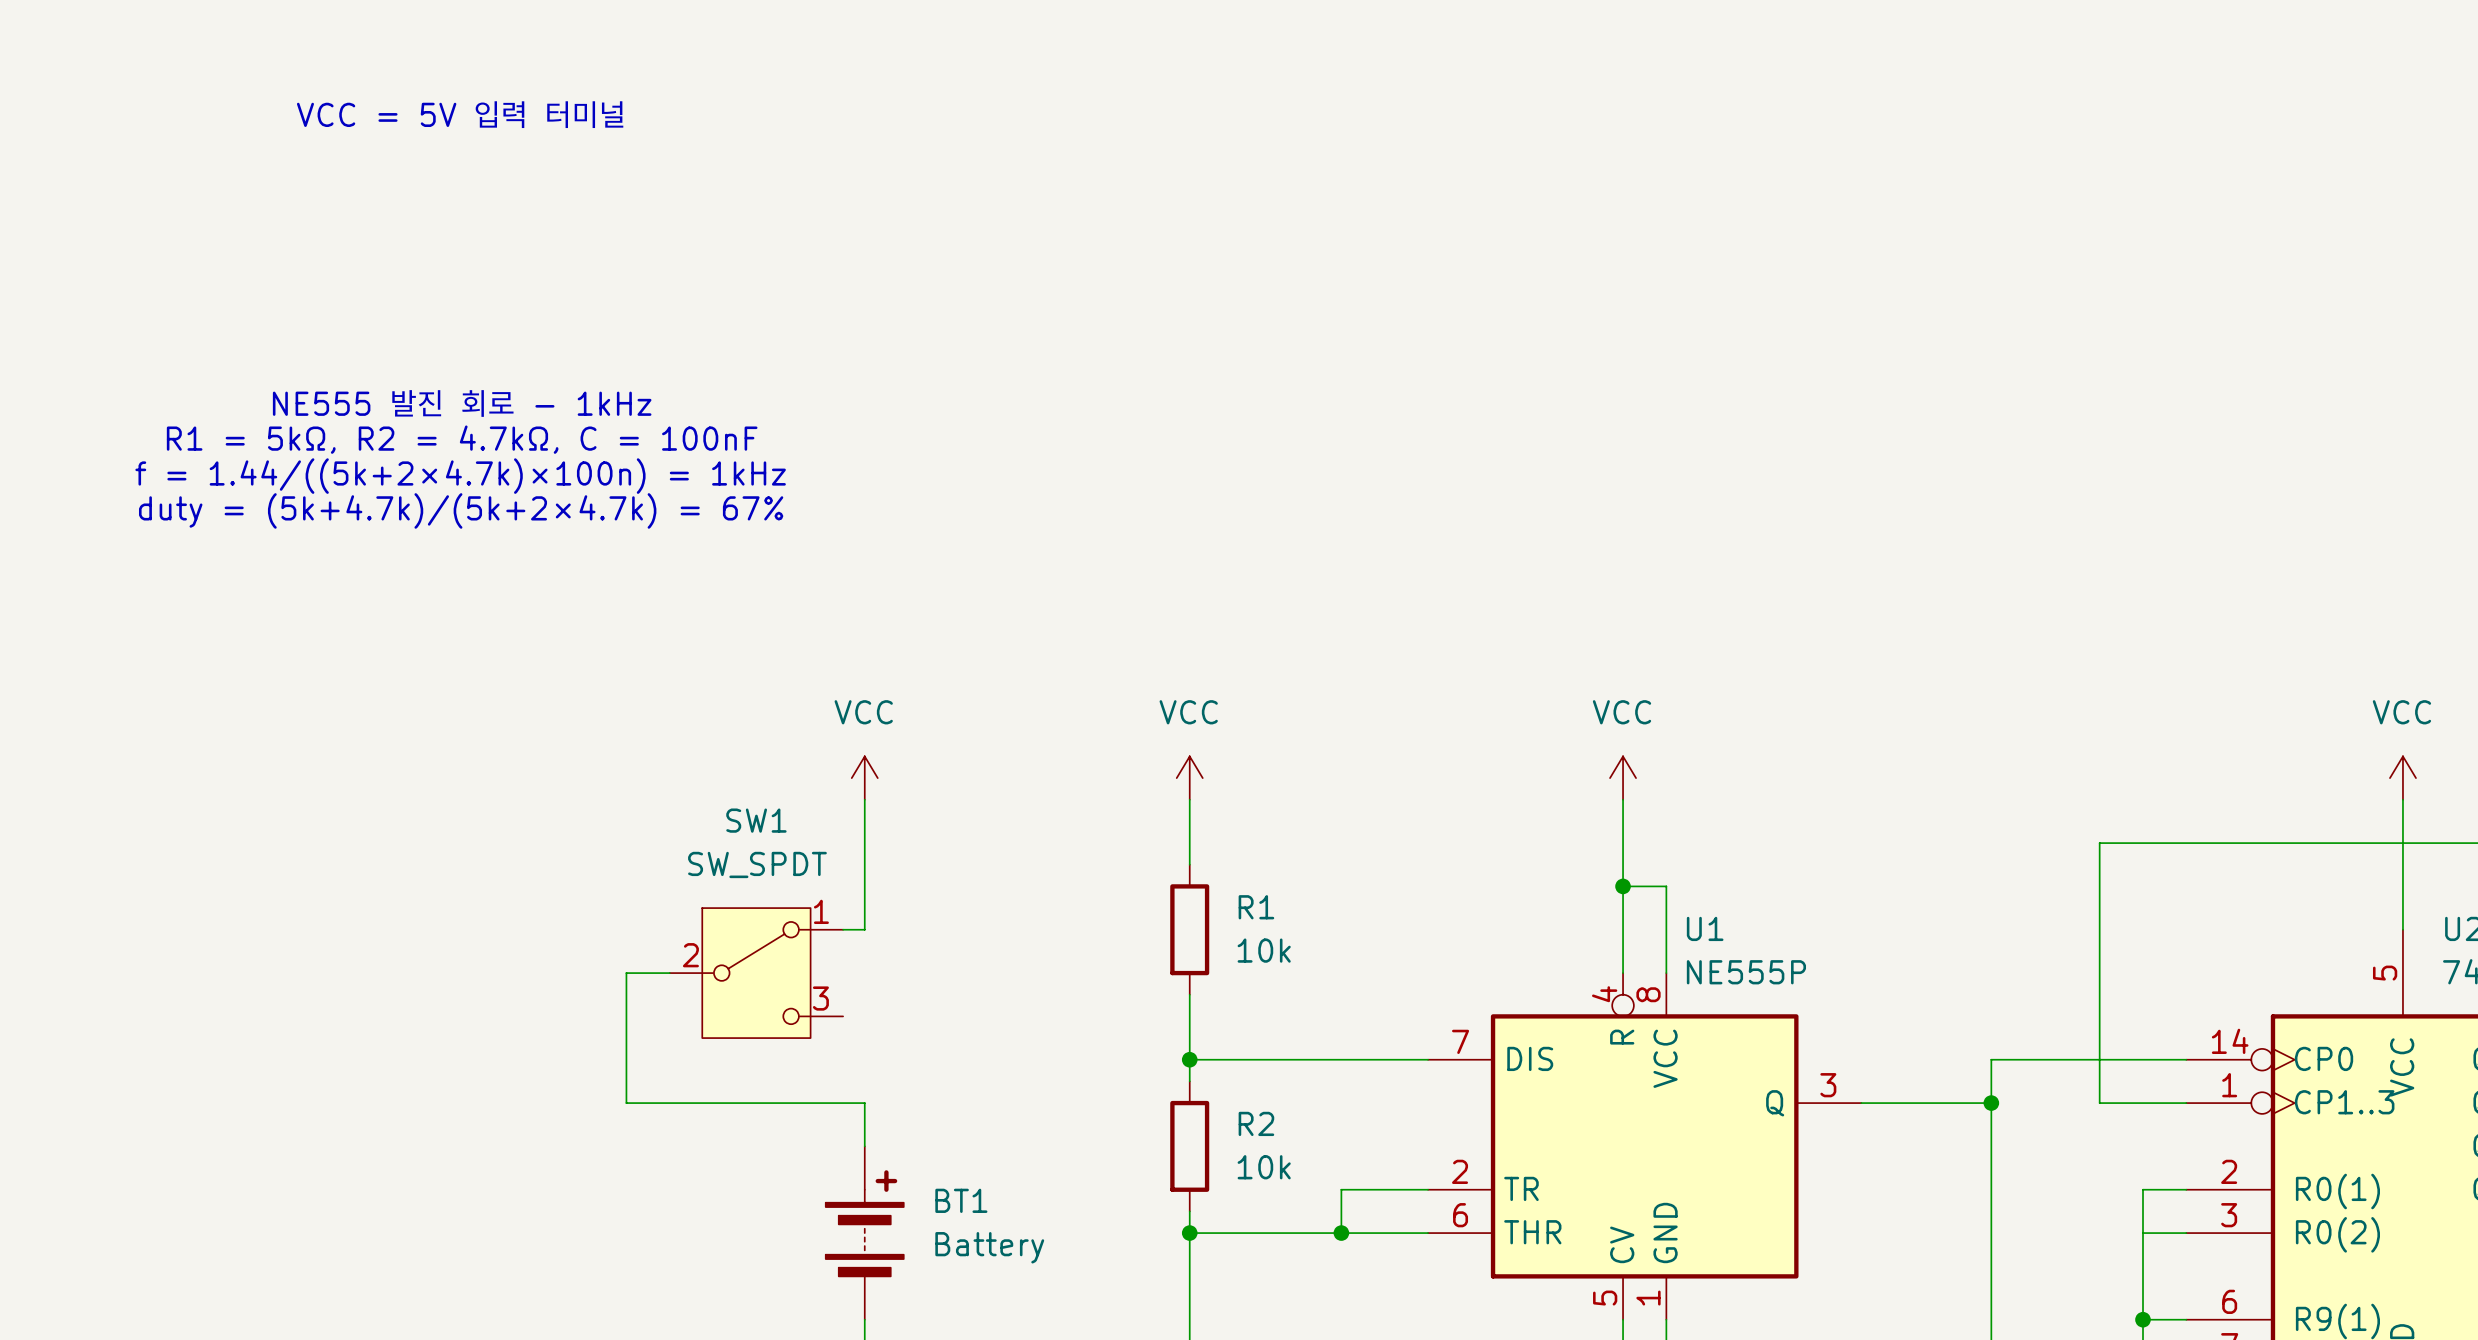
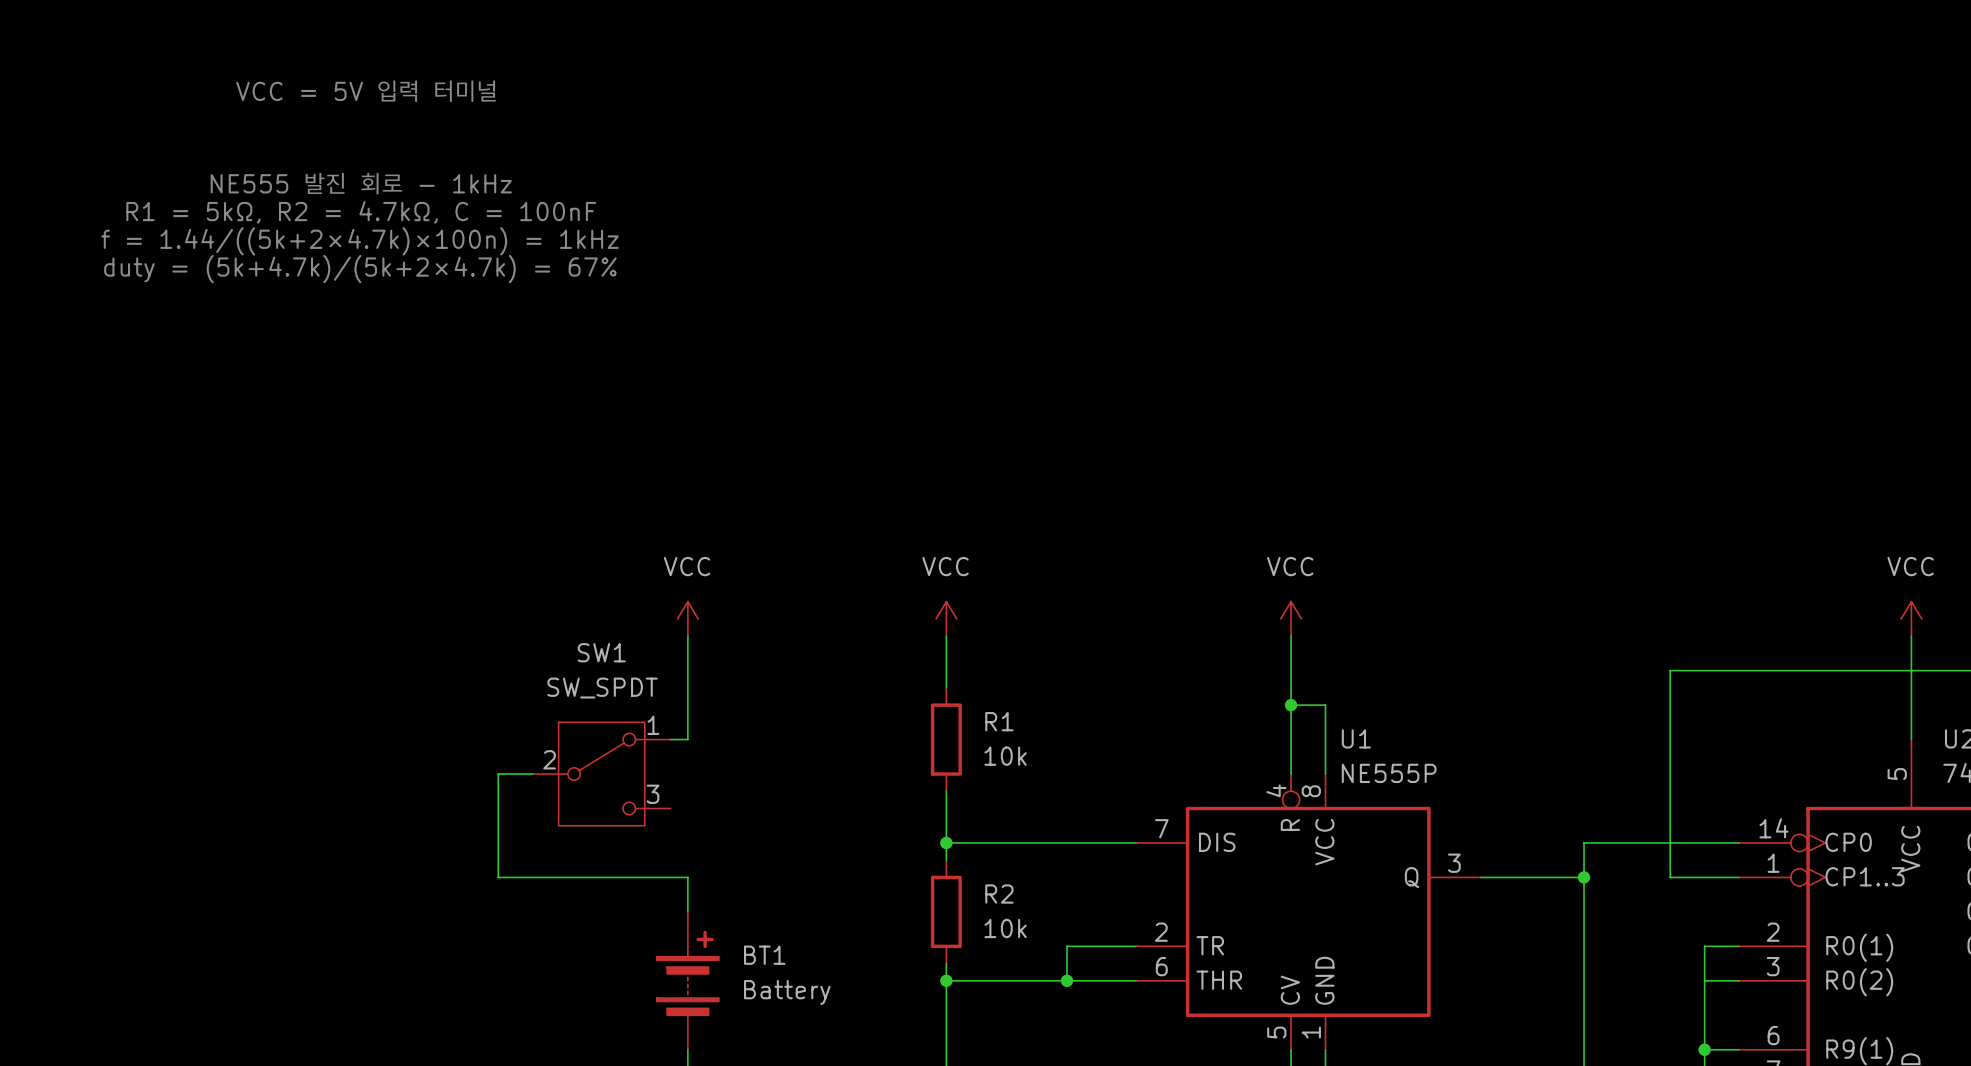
text position: NE555 발진 회로 - 1kHz (462, 403) -> NE555 발진 회로 - 1kHz (361, 183)
text position: R1 = 5kΩ, R2 = 4.7kΩ, C = 100nF (462, 439) -> R1 = 5kΩ, R2 = 4.7kΩ, C = 100nF (361, 212)
text position: f = 1.44/((5k+2×4.7k)×100n) = 1kHz (460, 476) -> f = 1.44/((5k+2×4.7k)×100n) = 1kHz (360, 241)
text position: duty = (5k+4.7k)/(5k+2×4.7k) = 67% (461, 510) -> duty = (5k+4.7k)/(5k+2×4.7k) = 67% (360, 269)

